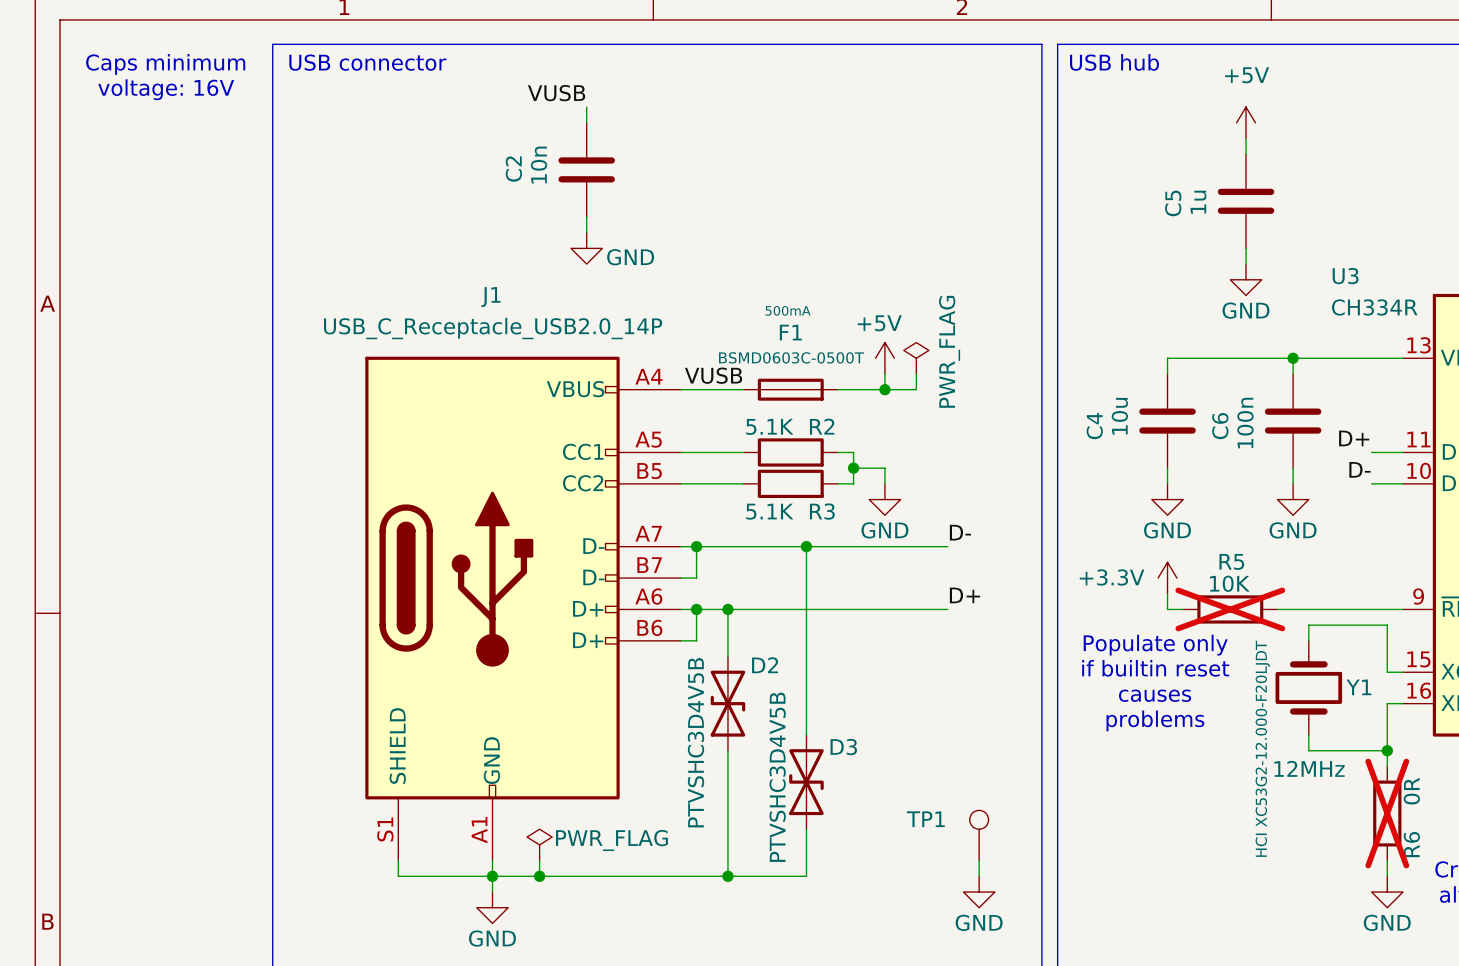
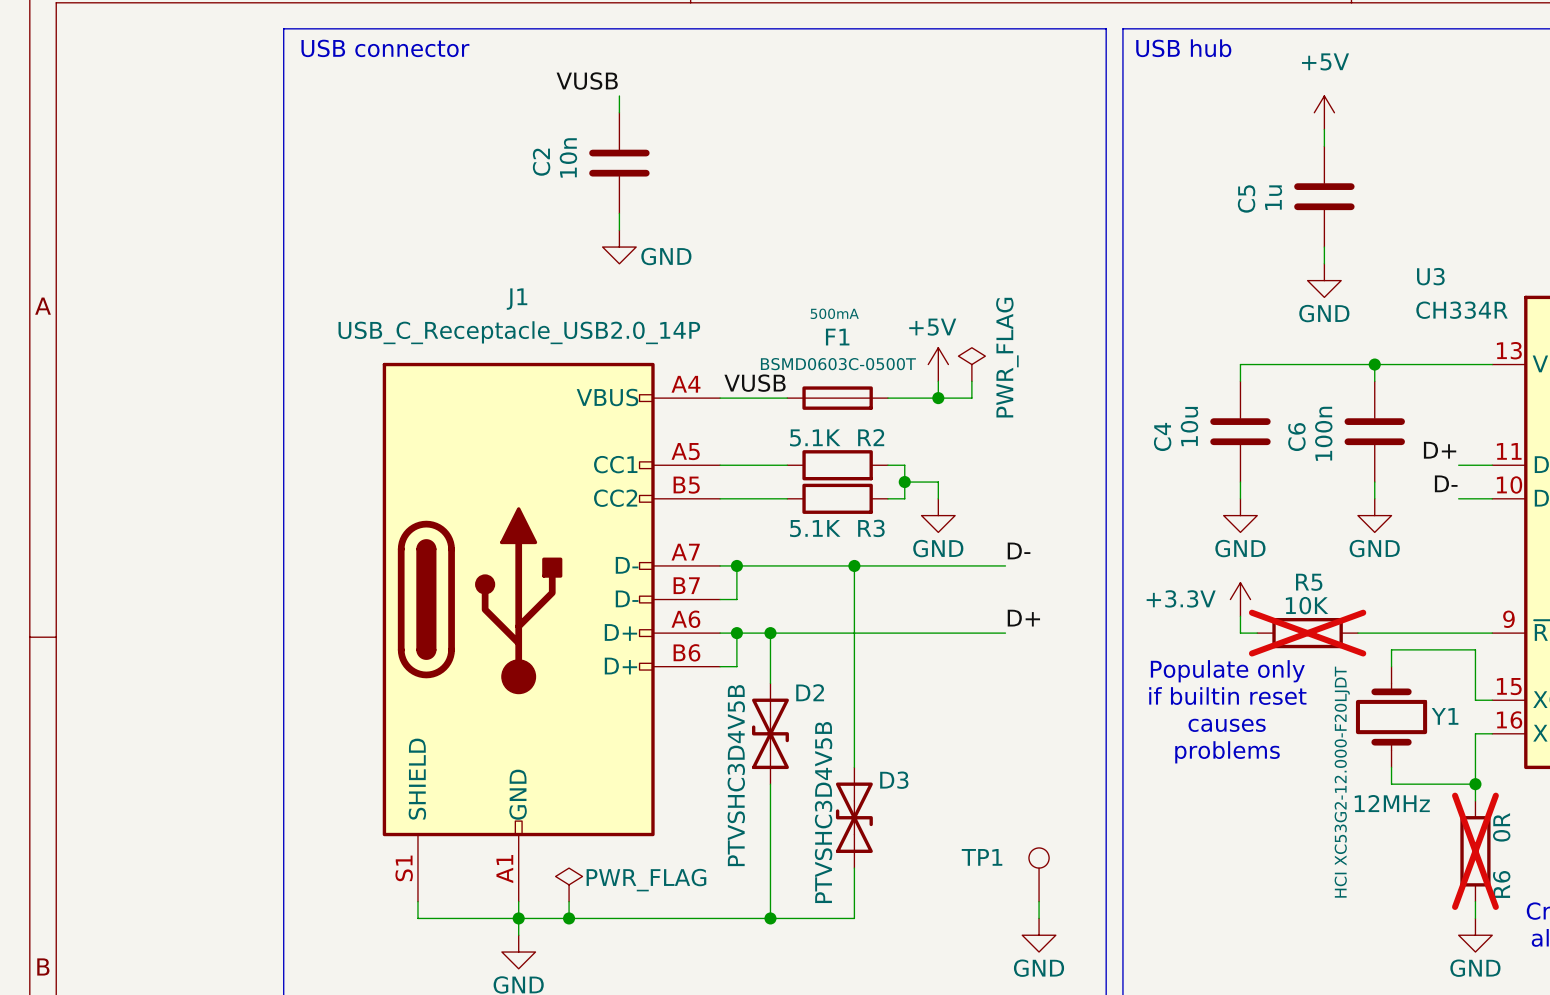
text: Caps minimum (165, 64) -> none
text: voltage: 16V (166, 89) -> none

